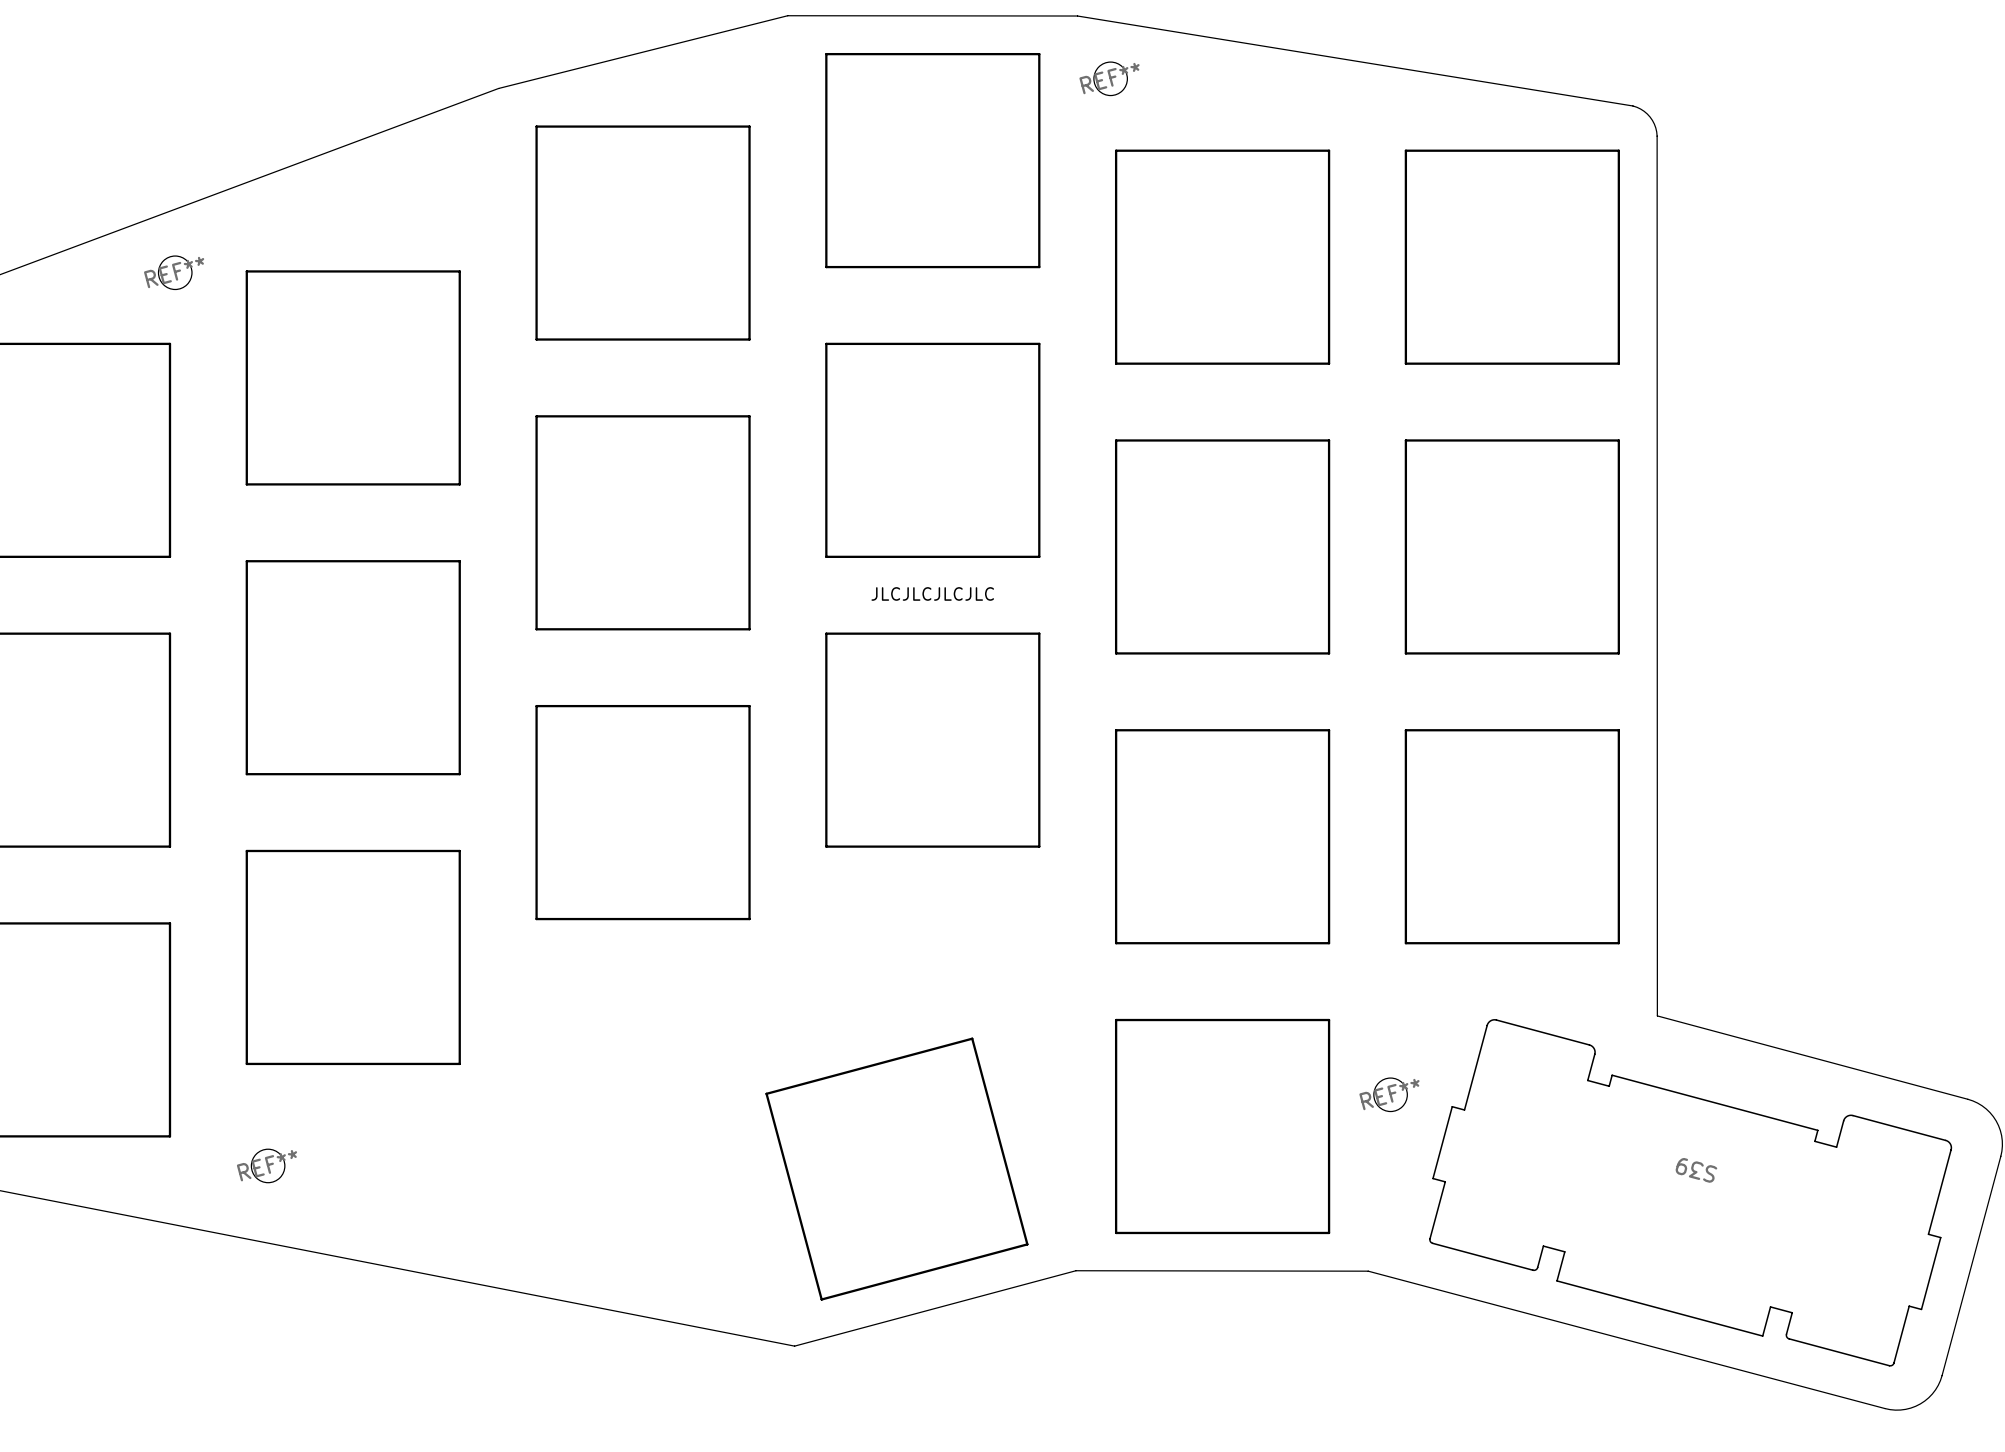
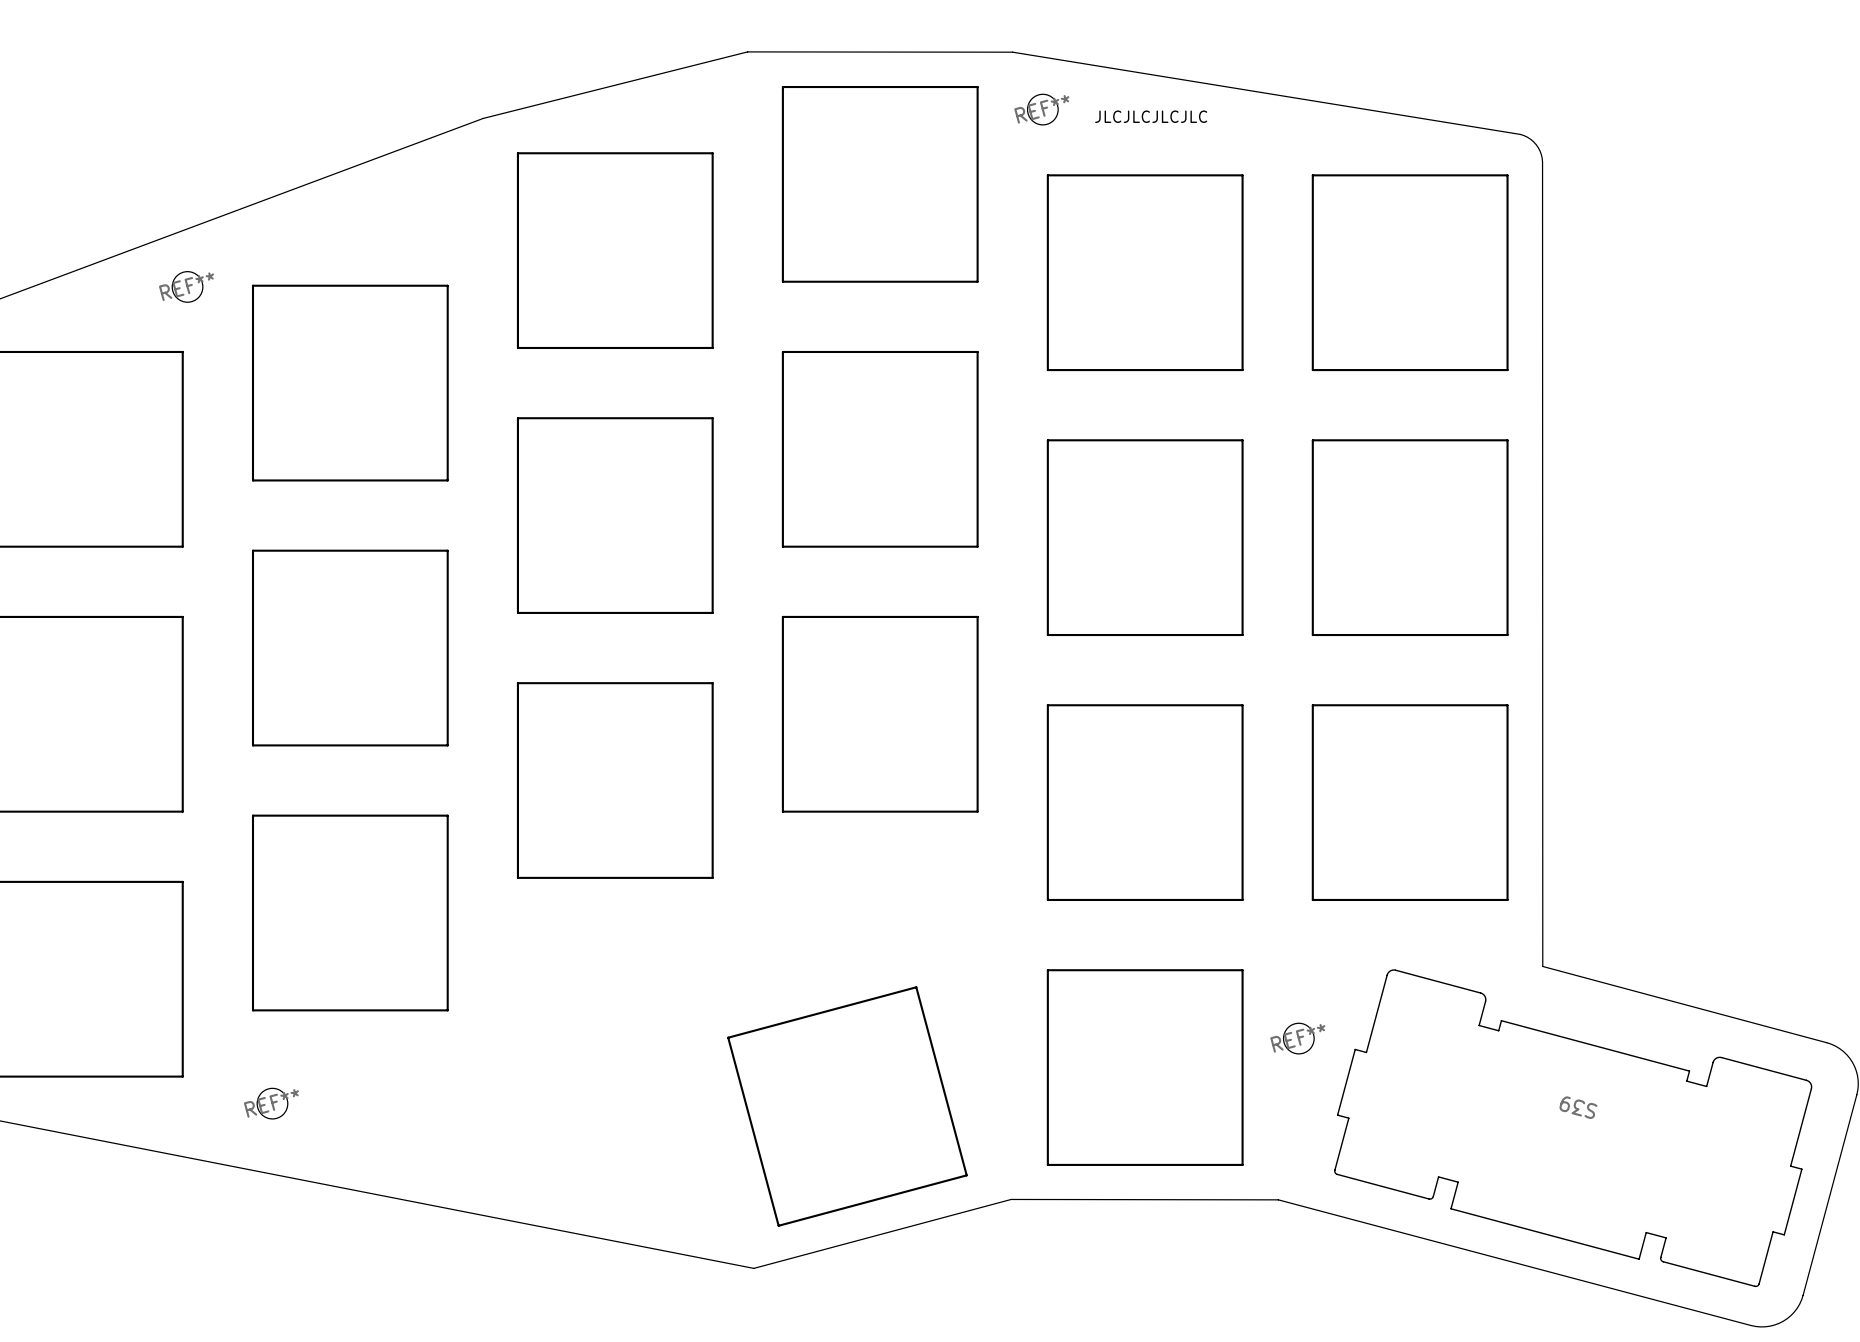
text: none -> JLCJLCJLCJLC (1151, 116)
text: JLCJLCJLCJLC (932, 593) -> none

